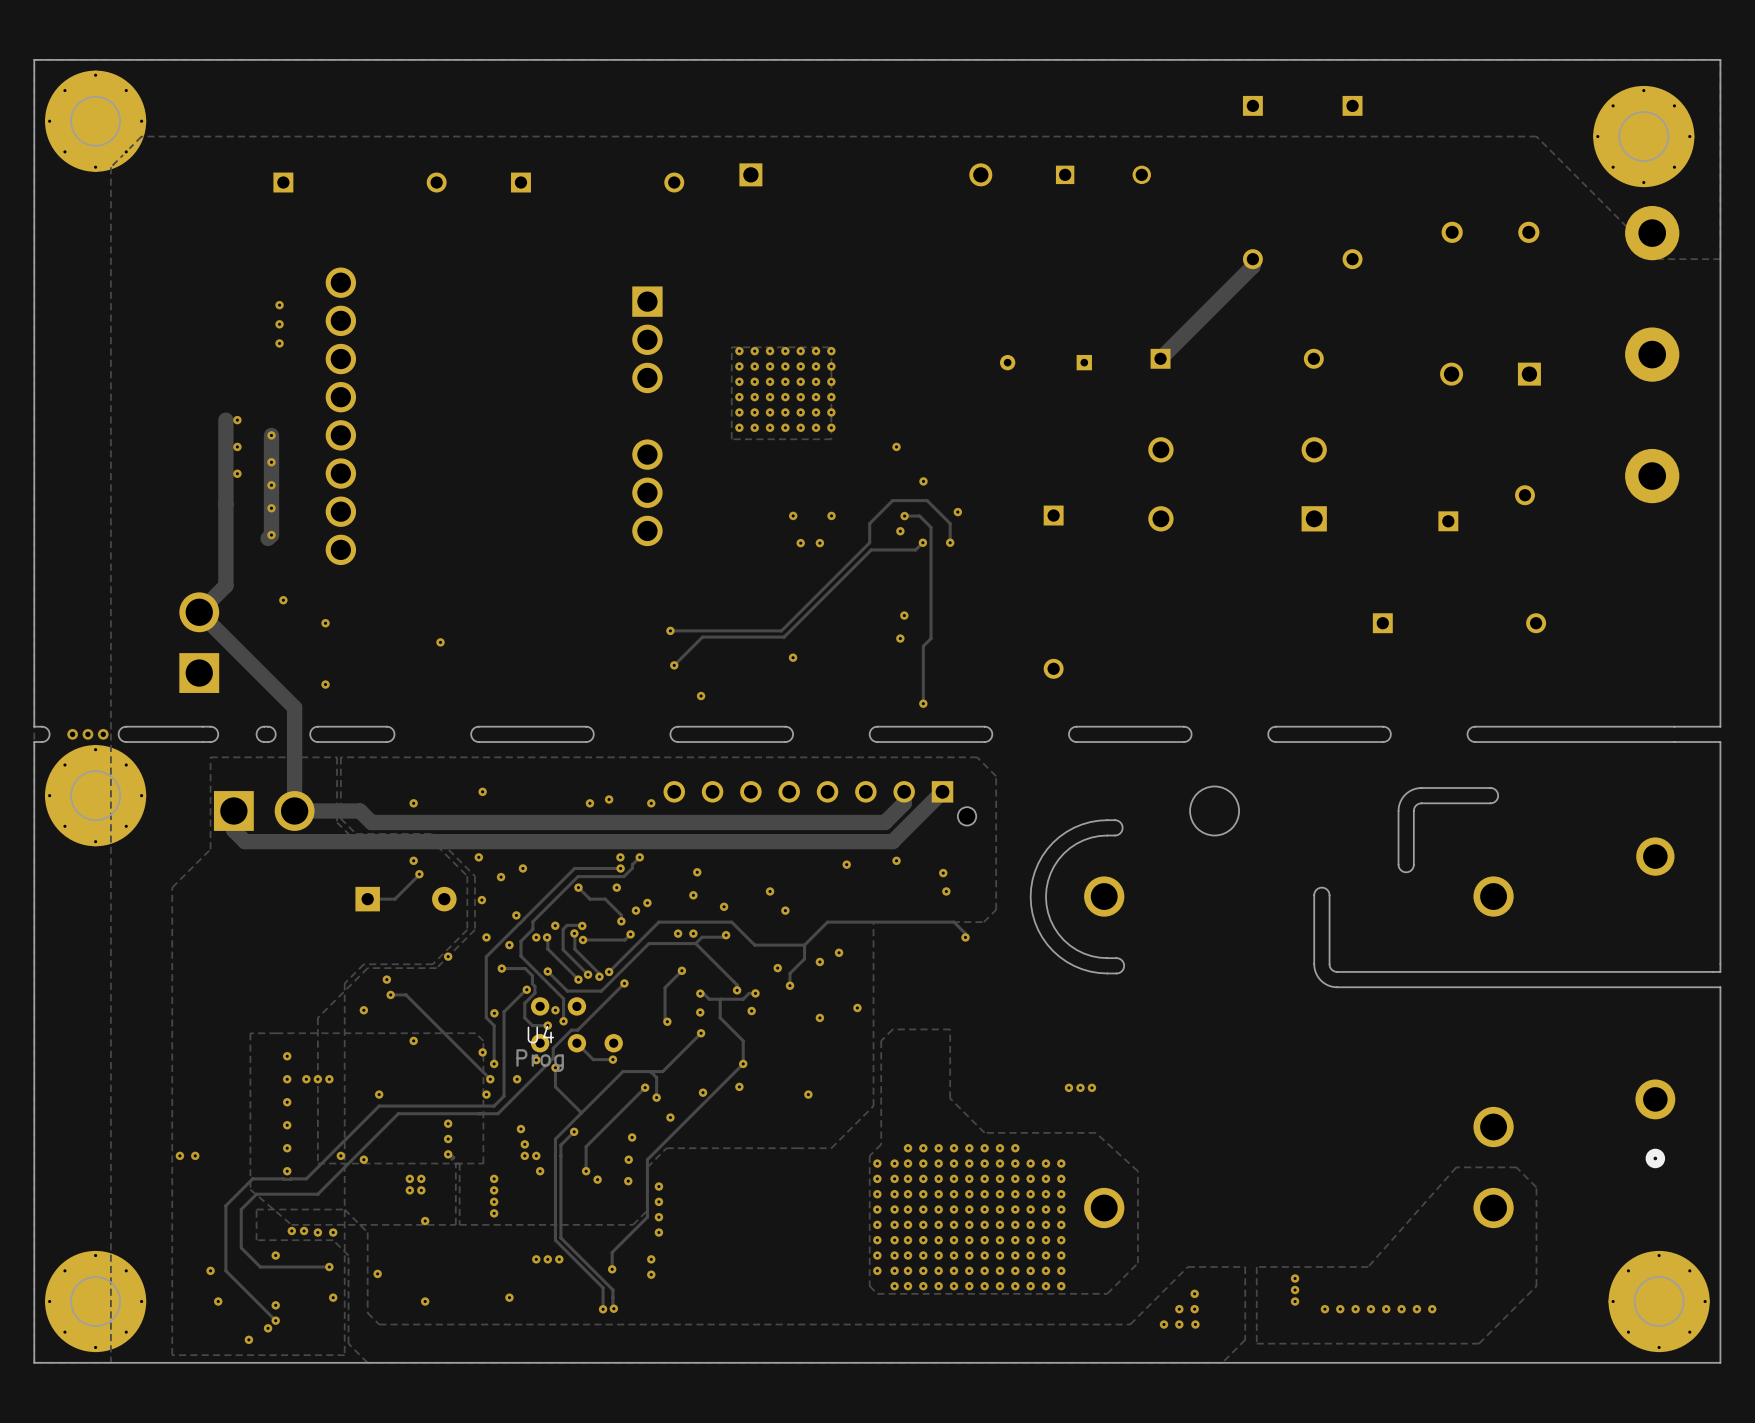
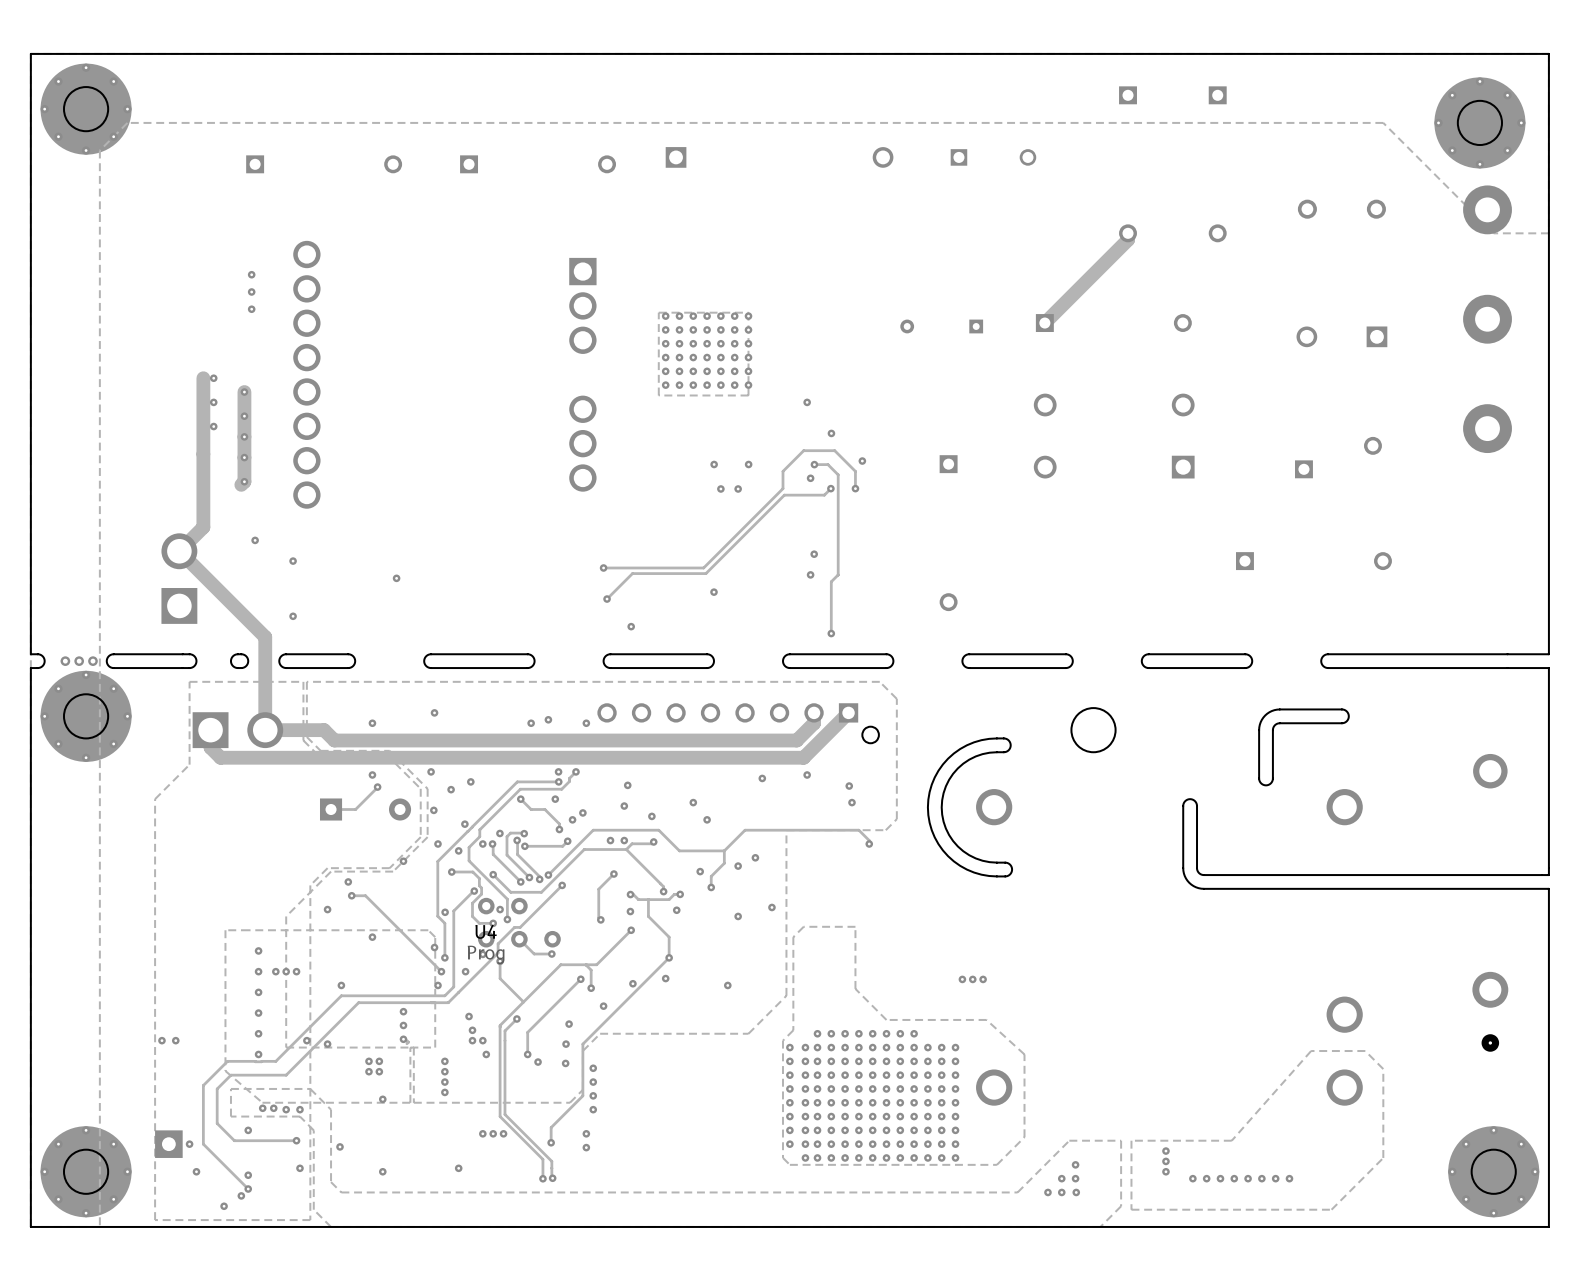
part: none -> (168, 1144)

